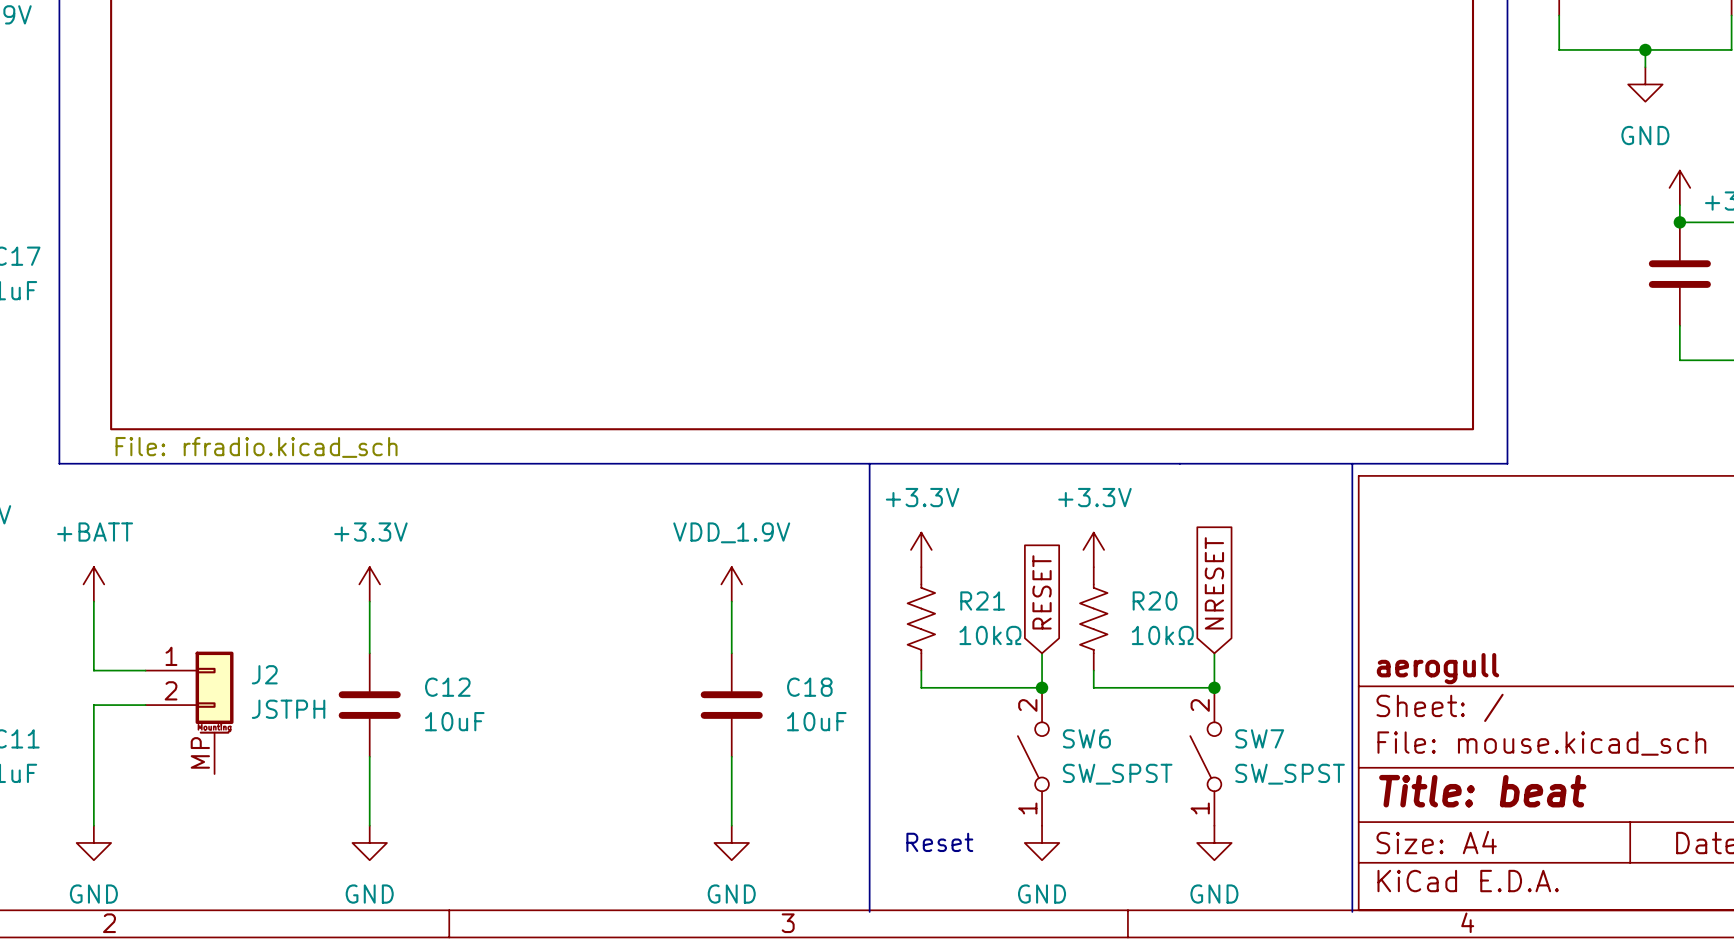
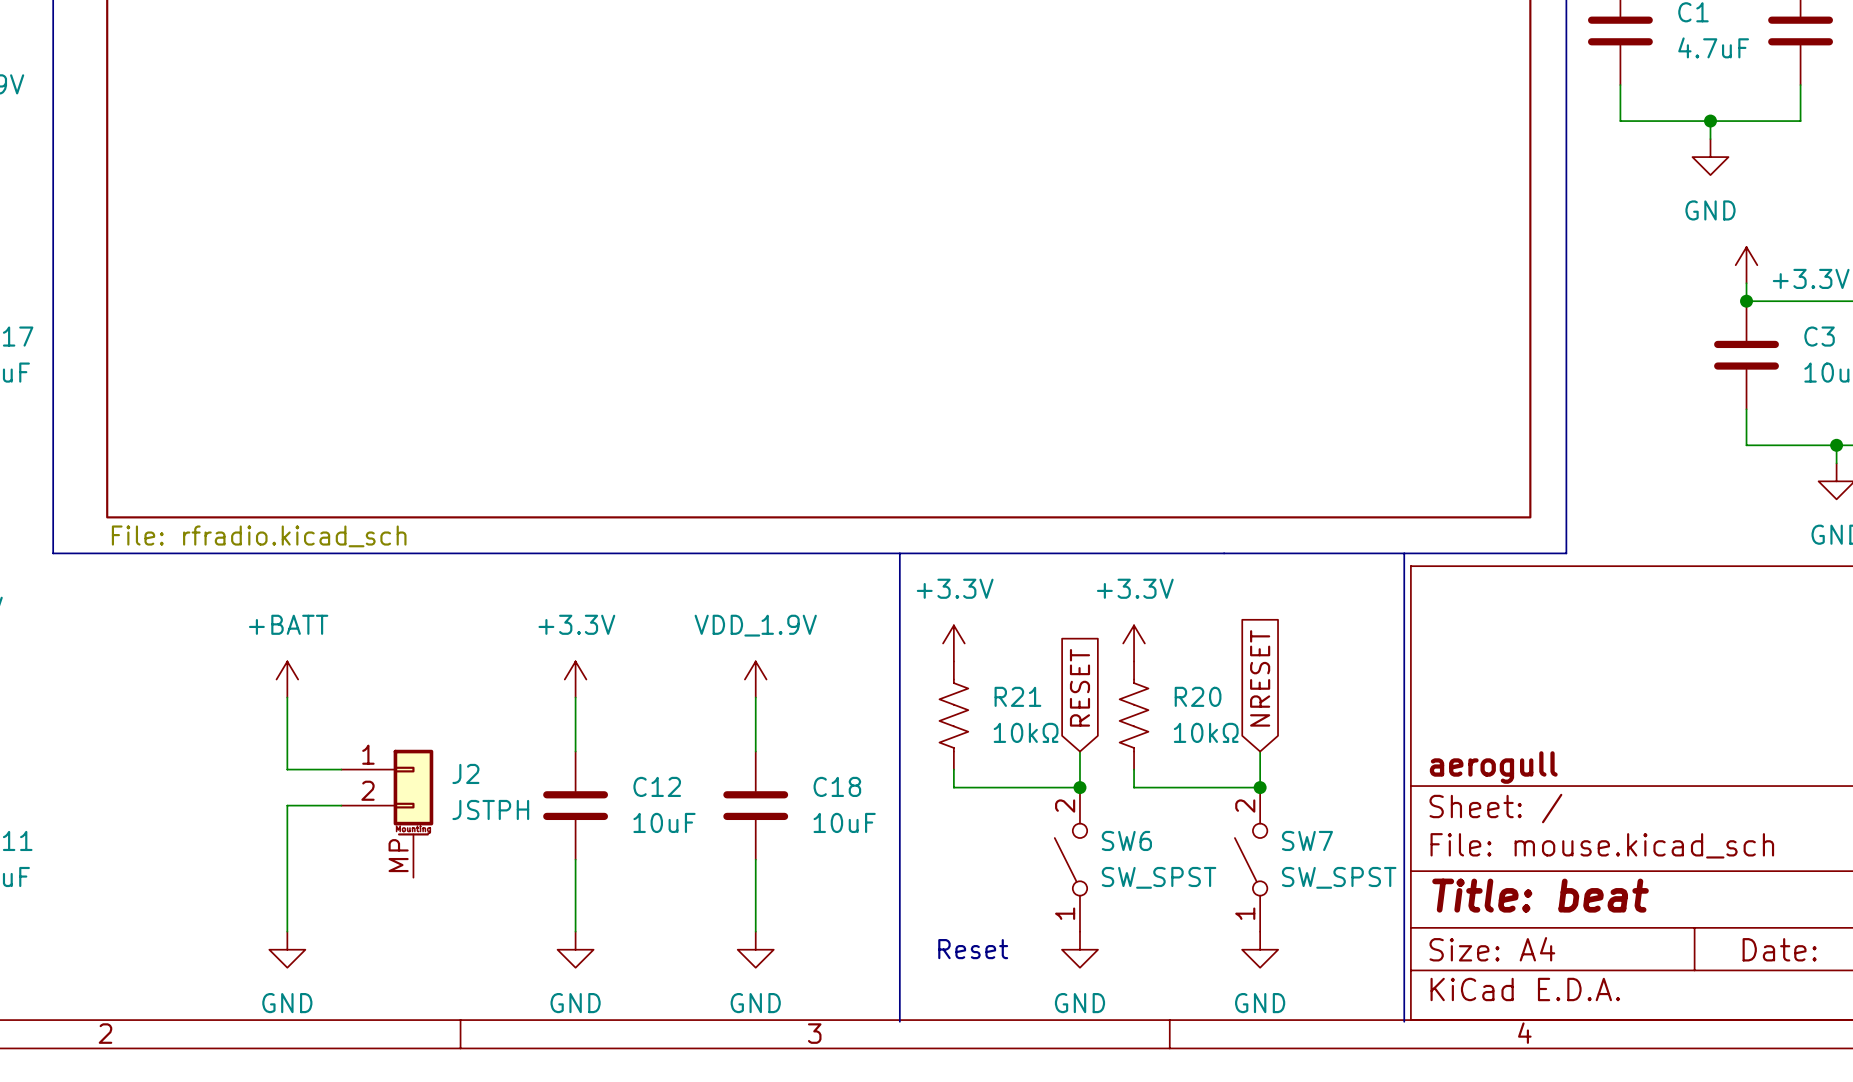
power symbol position: +BATT (93, 584) -> +BATT (287, 679)
power symbol position: +3.3V (369, 584) -> +3.3V (575, 679)
wire: (93, 601) (93, 670) (145, 670) -> (287, 697) (287, 769) (341, 769)
wire: (369, 601) (369, 653) -> (575, 697) (575, 751)
wire: (145, 705) (93, 705) (93, 825) -> (341, 805) (287, 805) (287, 931)
C12 position: (369, 705) -> (575, 805)
J2 position: (189, 712) -> (387, 813)
wire: (369, 756) (369, 825) -> (575, 859) (575, 931)
power symbol: GND (93, 842) -> none
power symbol position: GND (369, 842) -> GND (287, 949)
power symbol: none -> GND (575, 949)

